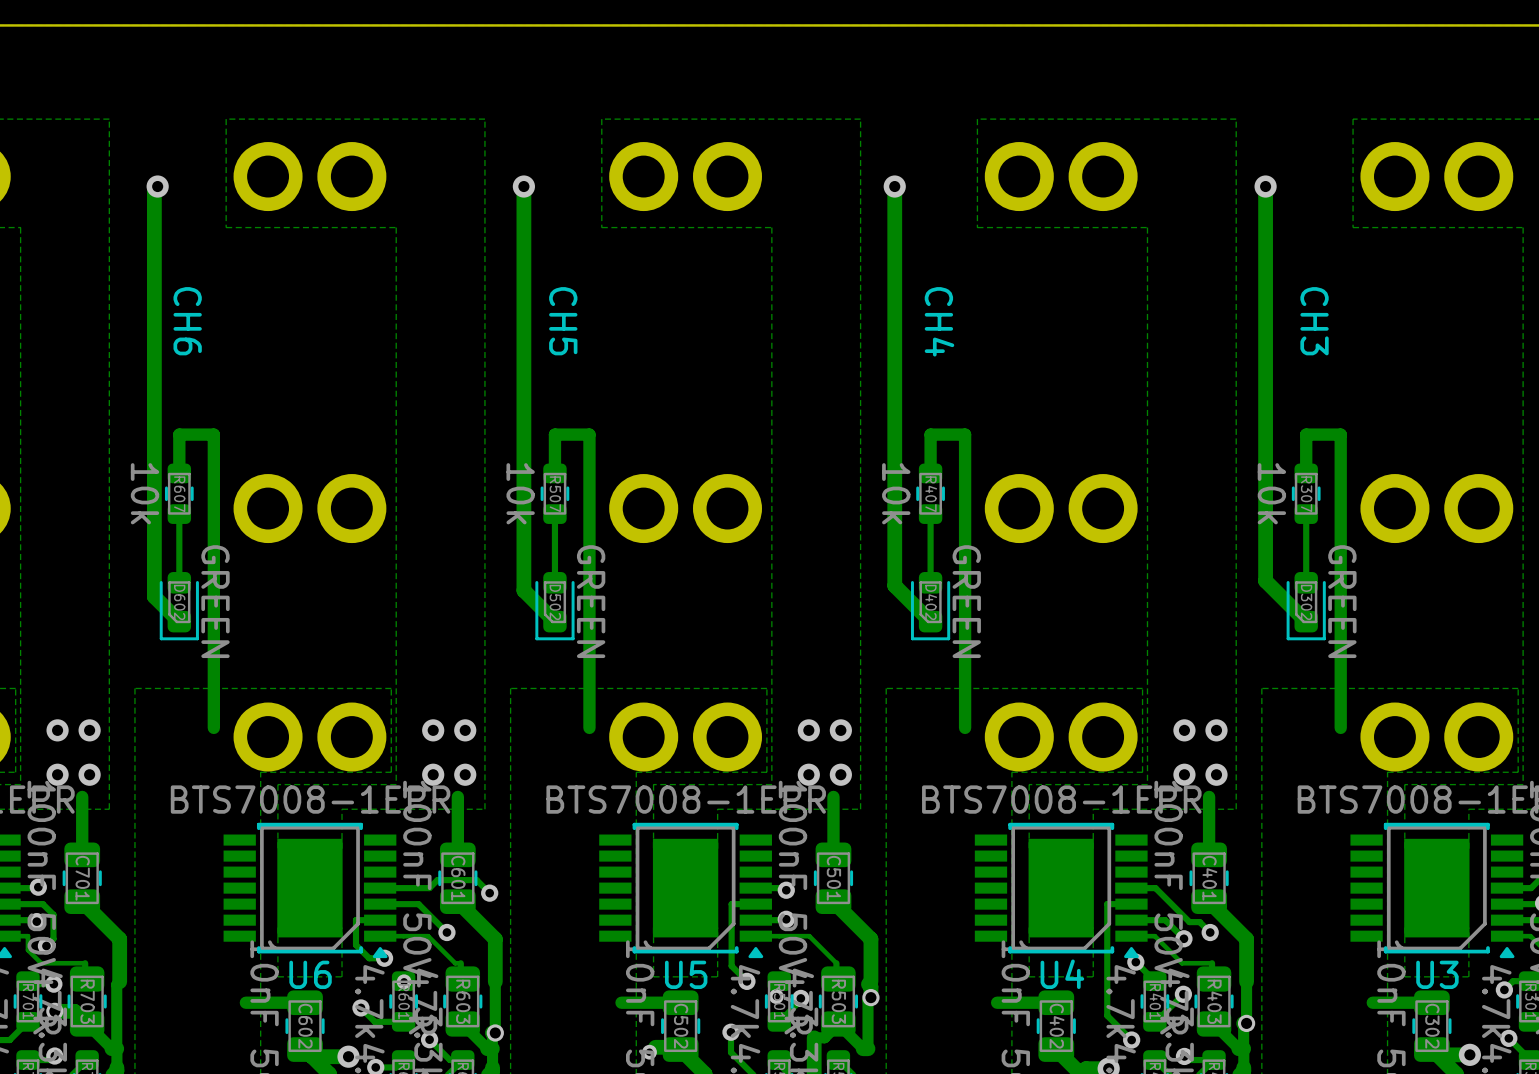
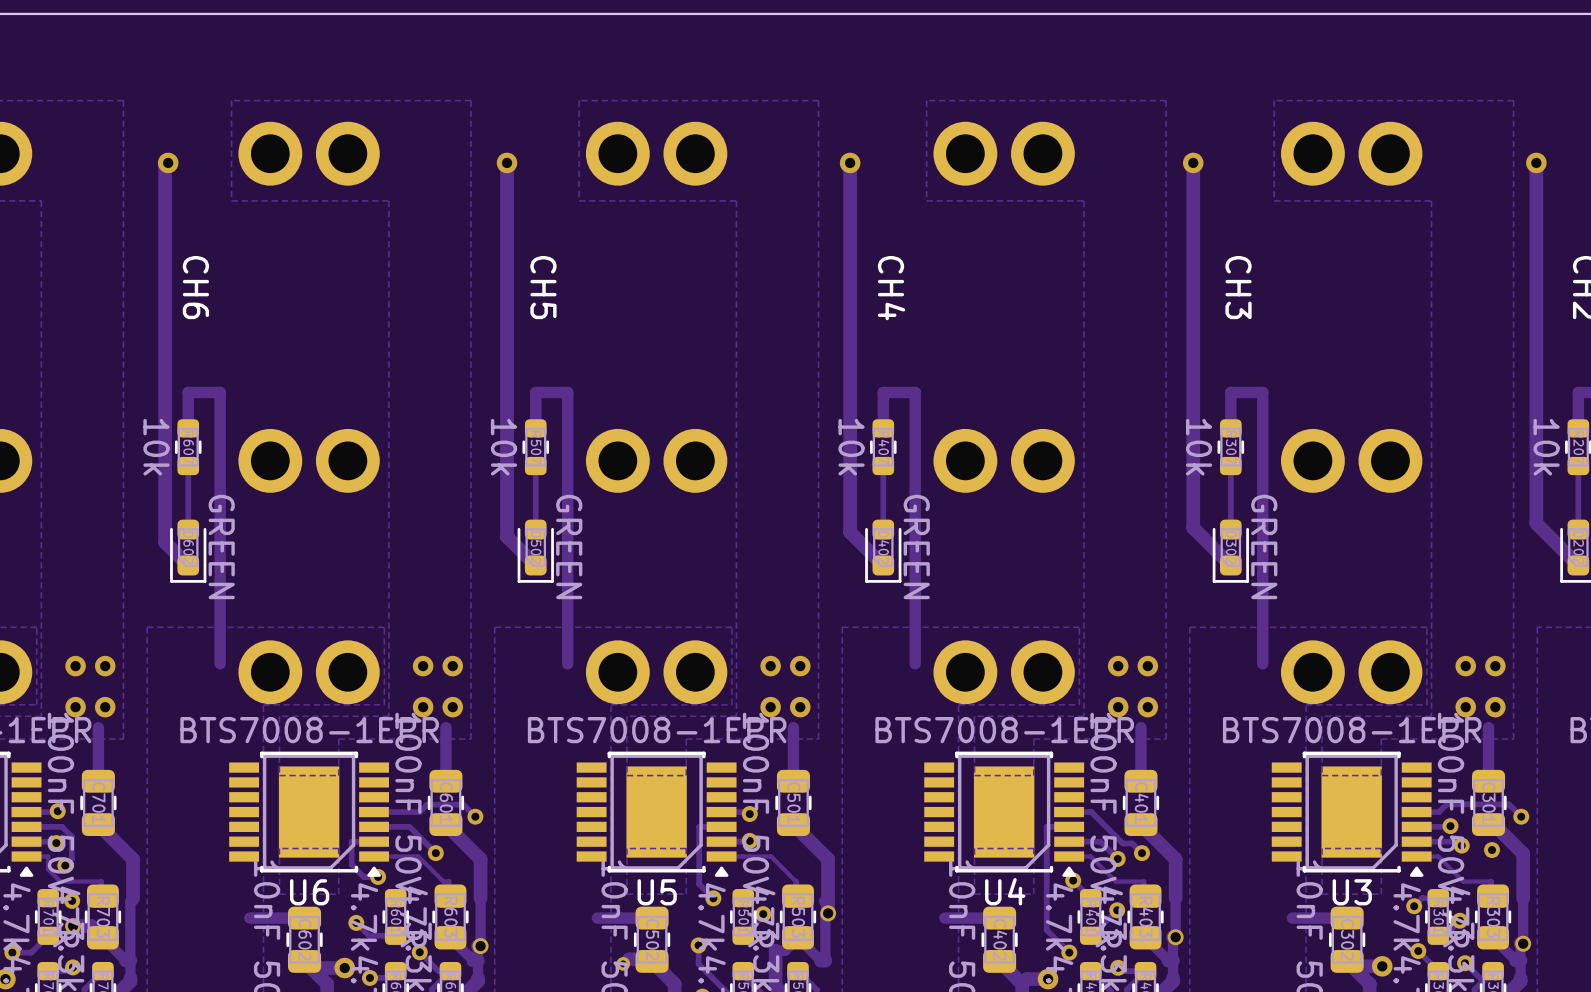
via: (404, 981) -> none
via: (776, 996) -> none

